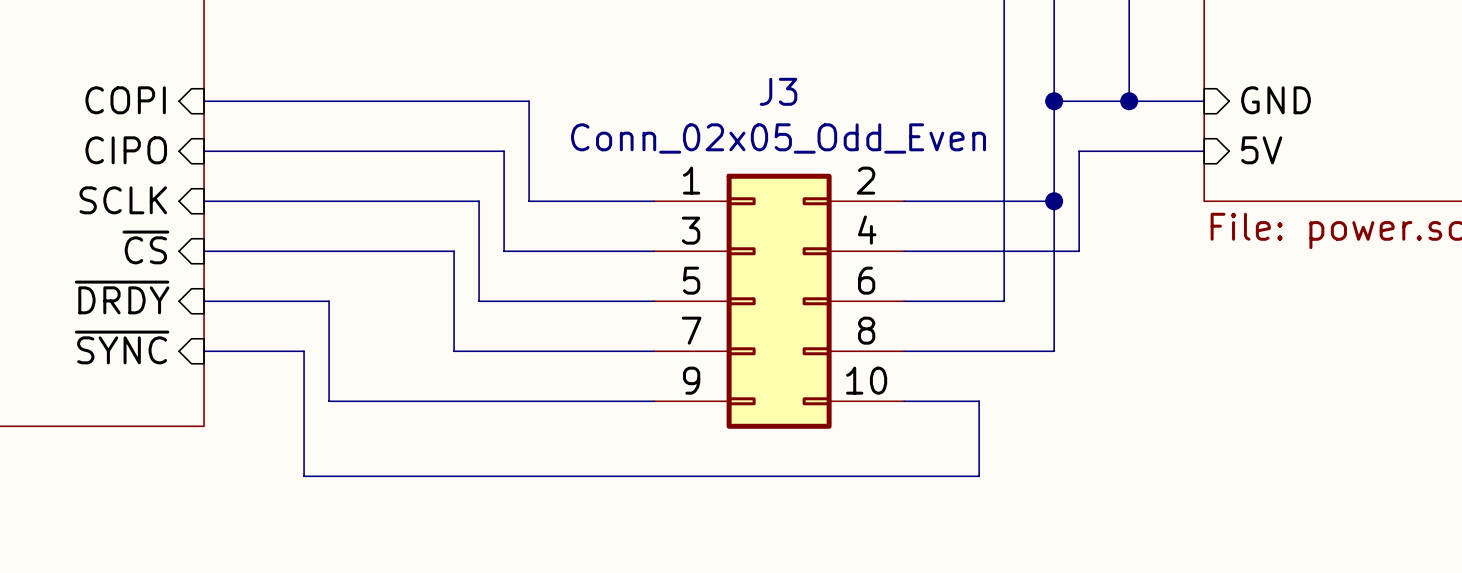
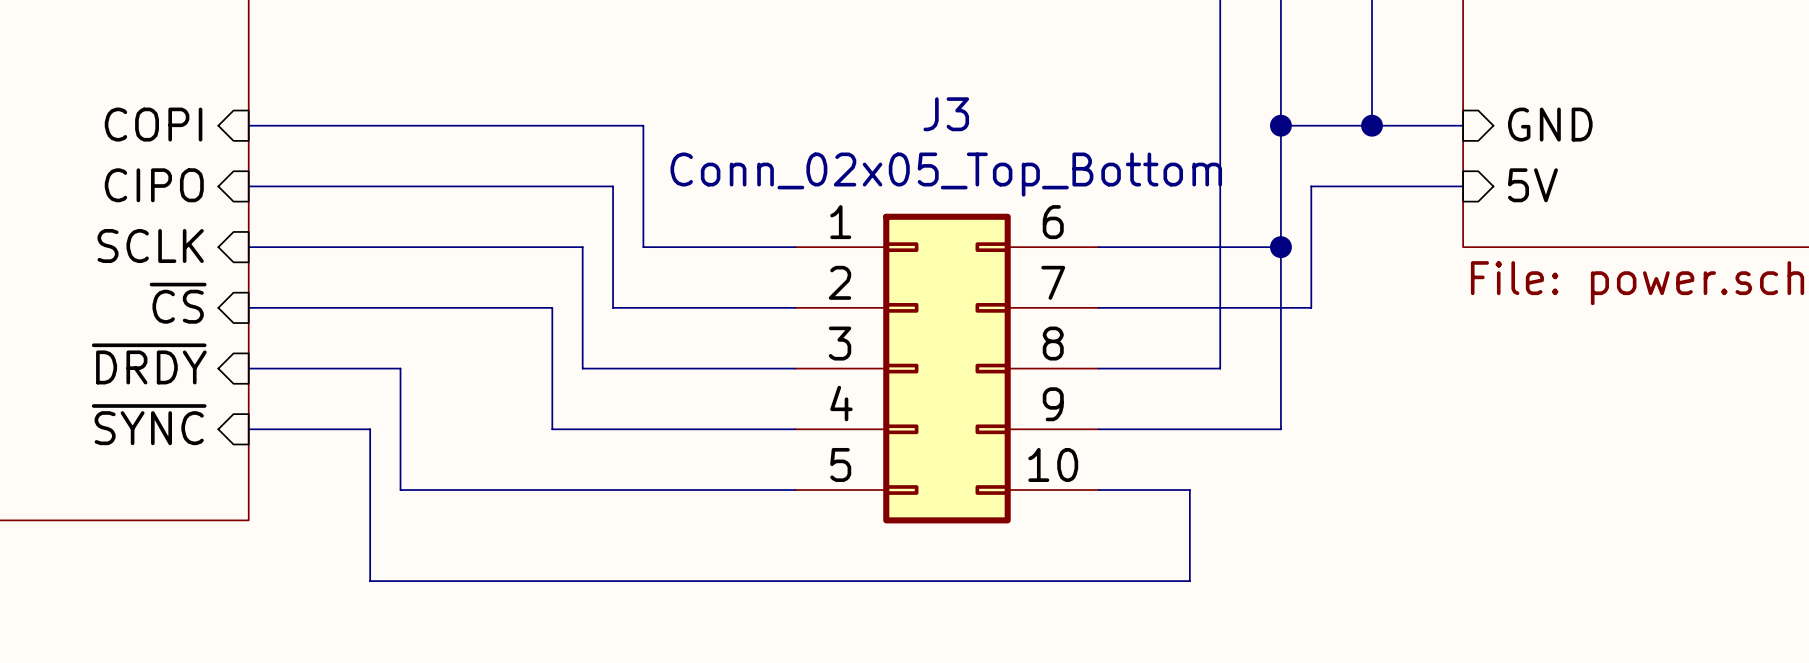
J3 value: Conn_02x05_Odd_Even (778, 138) -> Conn_02x05_Top_Bottom (946, 174)
J3 pin number: 2 (866, 180) -> 6 (1053, 222)
J3 pin number: 3 (691, 230) -> 2 (840, 282)
J3 pin number: 4 (867, 230) -> 7 (1053, 282)
J3 pin number: 5 (691, 280) -> 3 (840, 343)
J3 pin number: 6 (866, 280) -> 8 (1053, 343)
J3 pin number: 7 (691, 330) -> 4 (841, 403)
J3 pin number: 8 (866, 330) -> 9 (1053, 404)
J3 pin number: 9 (691, 380) -> 5 (840, 464)

